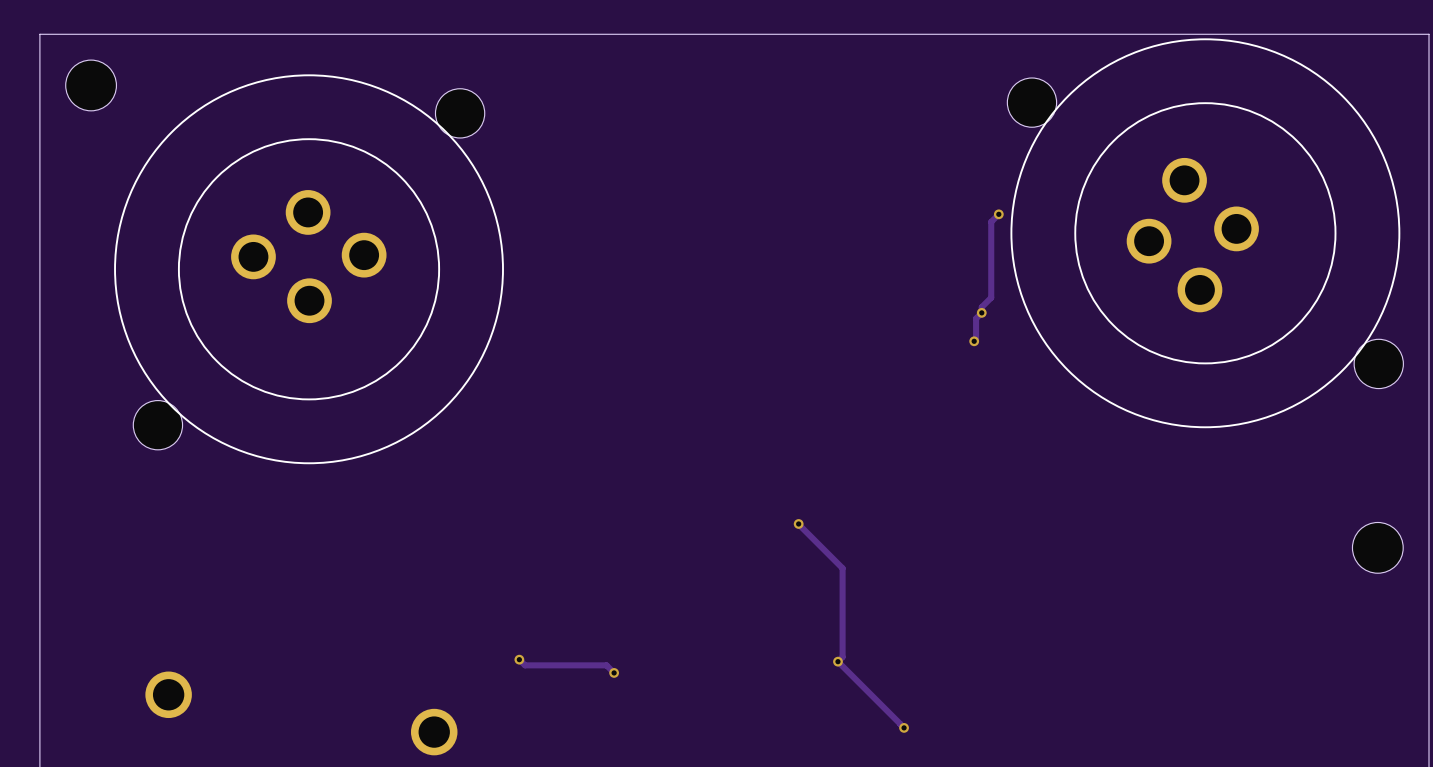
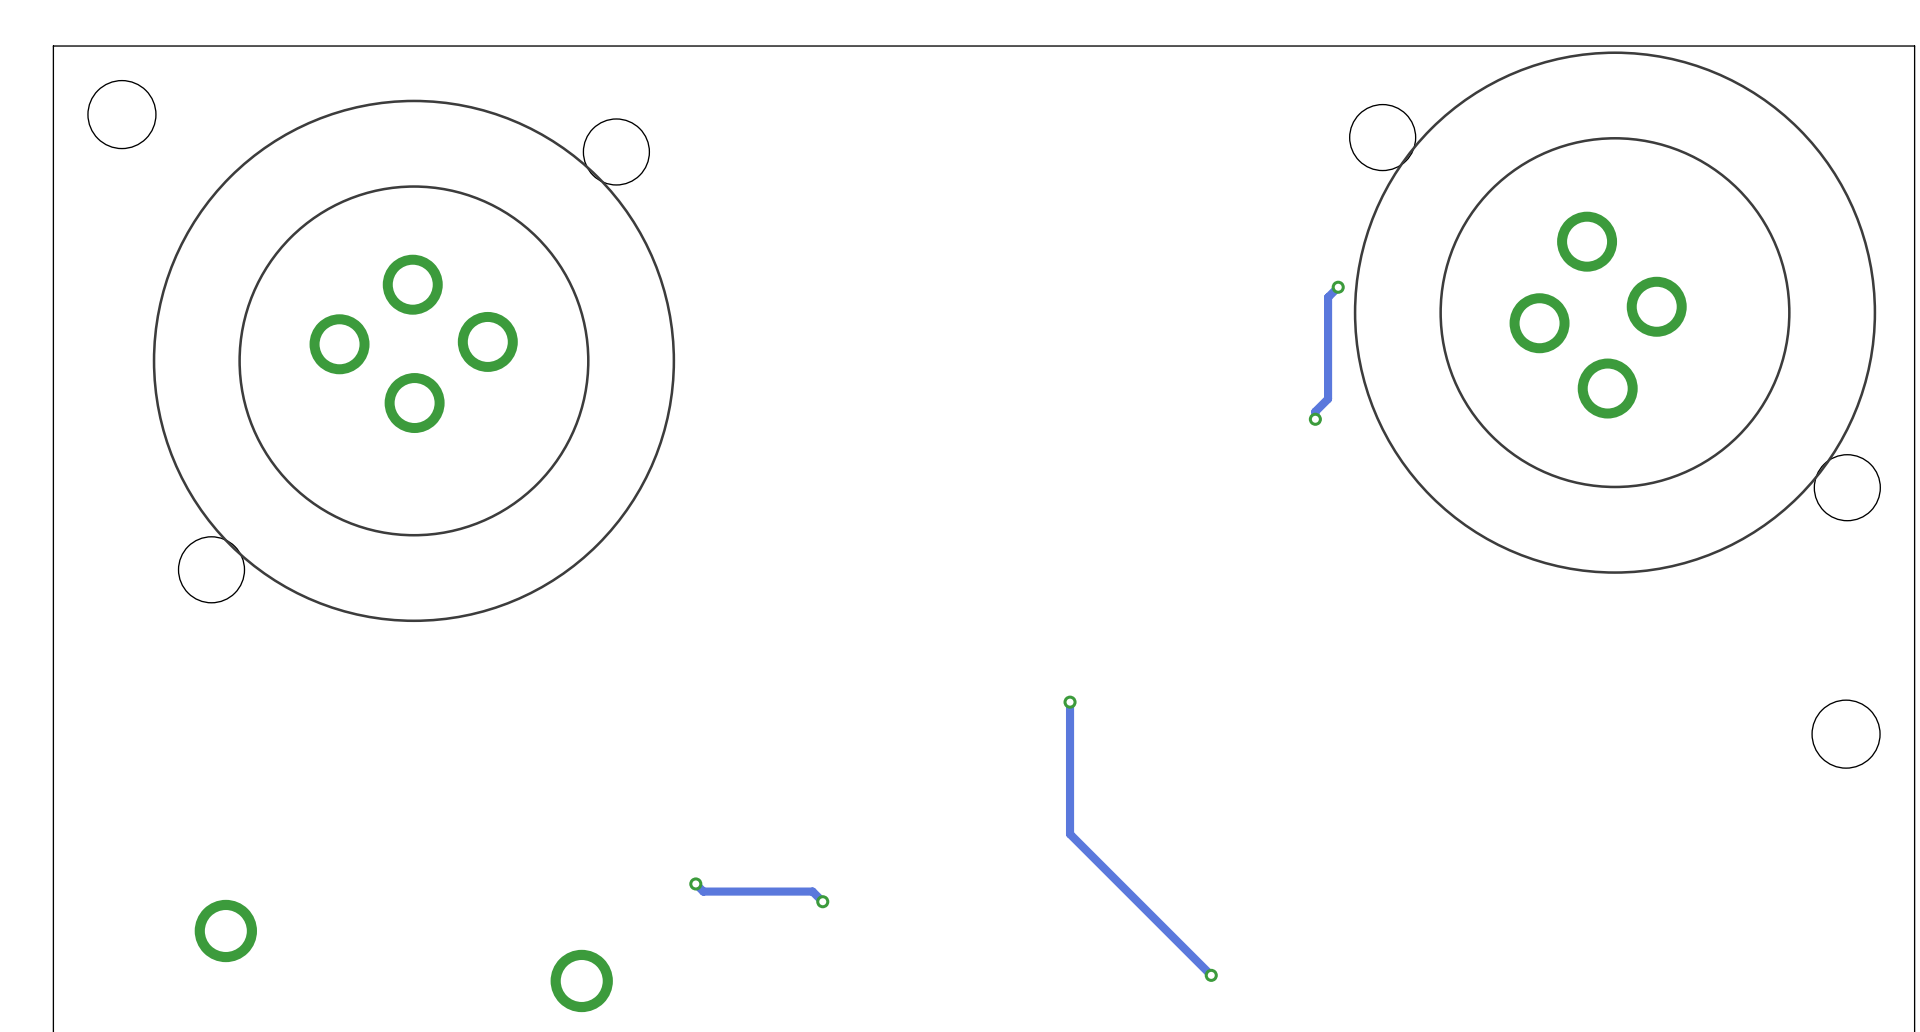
track: (981, 312) (976, 318) (976, 341) (974, 341) -> none
via: (974, 341) -> none
track: (798, 524) (842, 568) (842, 657) (837, 661) (900, 723) -> (1070, 702) (1070, 834) (1206, 970)
via: (837, 661) -> none

